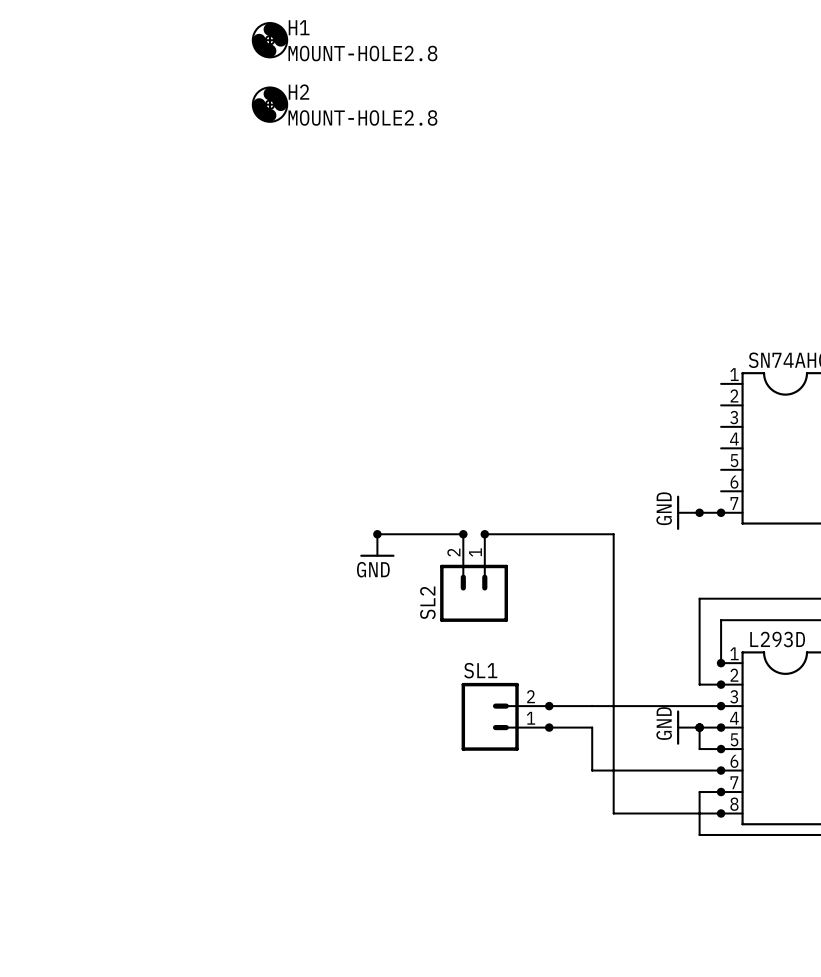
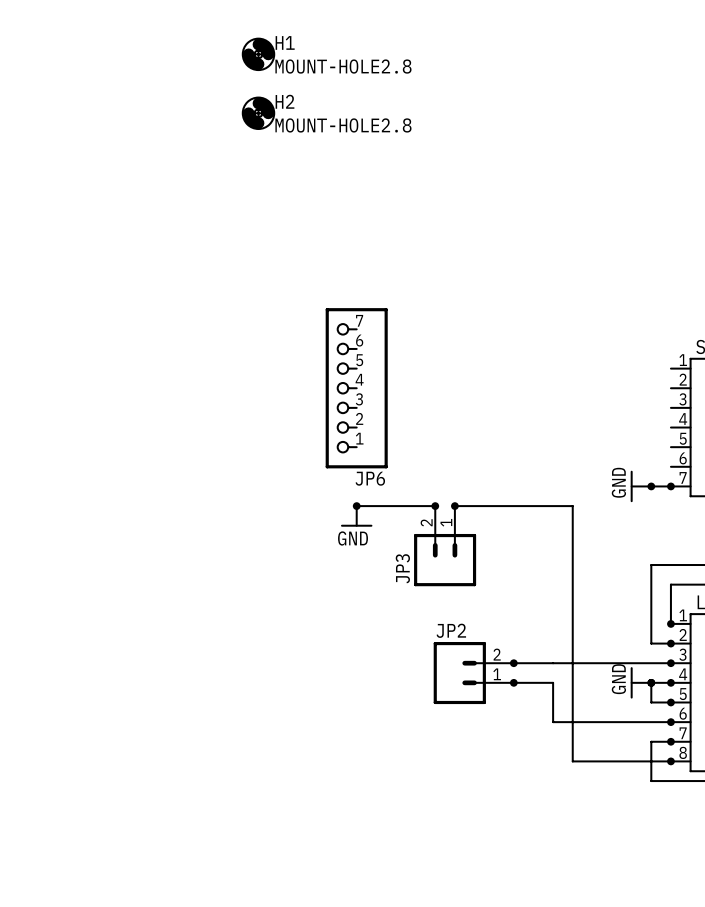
JP6: none -> (356, 388)
SL2 name: SL2 (427, 602) -> JP3 (402, 568)
SL1 name: SL1 (480, 670) -> JP2 (451, 630)

